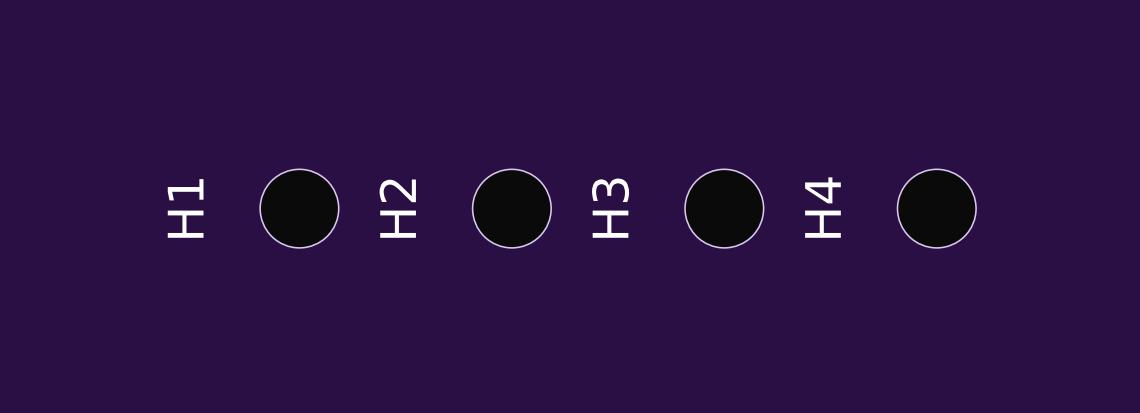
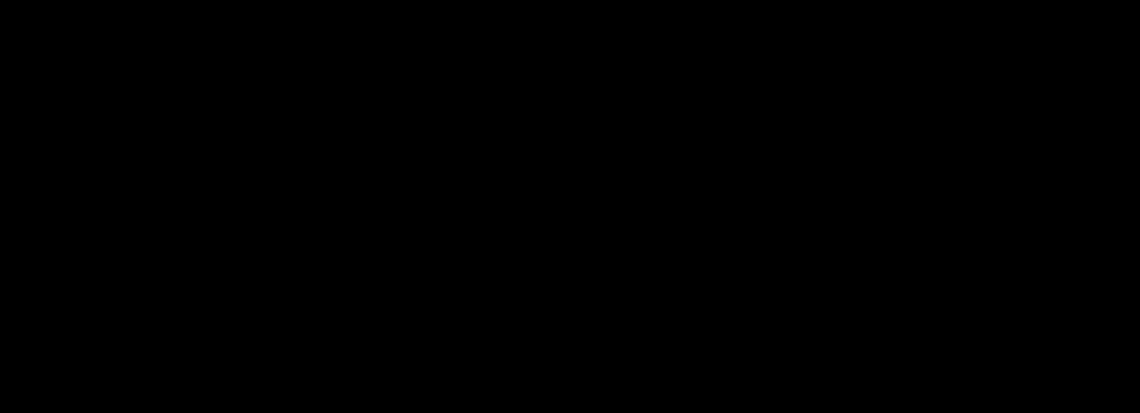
H1: (299, 208) -> none
H2: (511, 208) -> none
H3: (724, 208) -> none
H4: (936, 208) -> none

